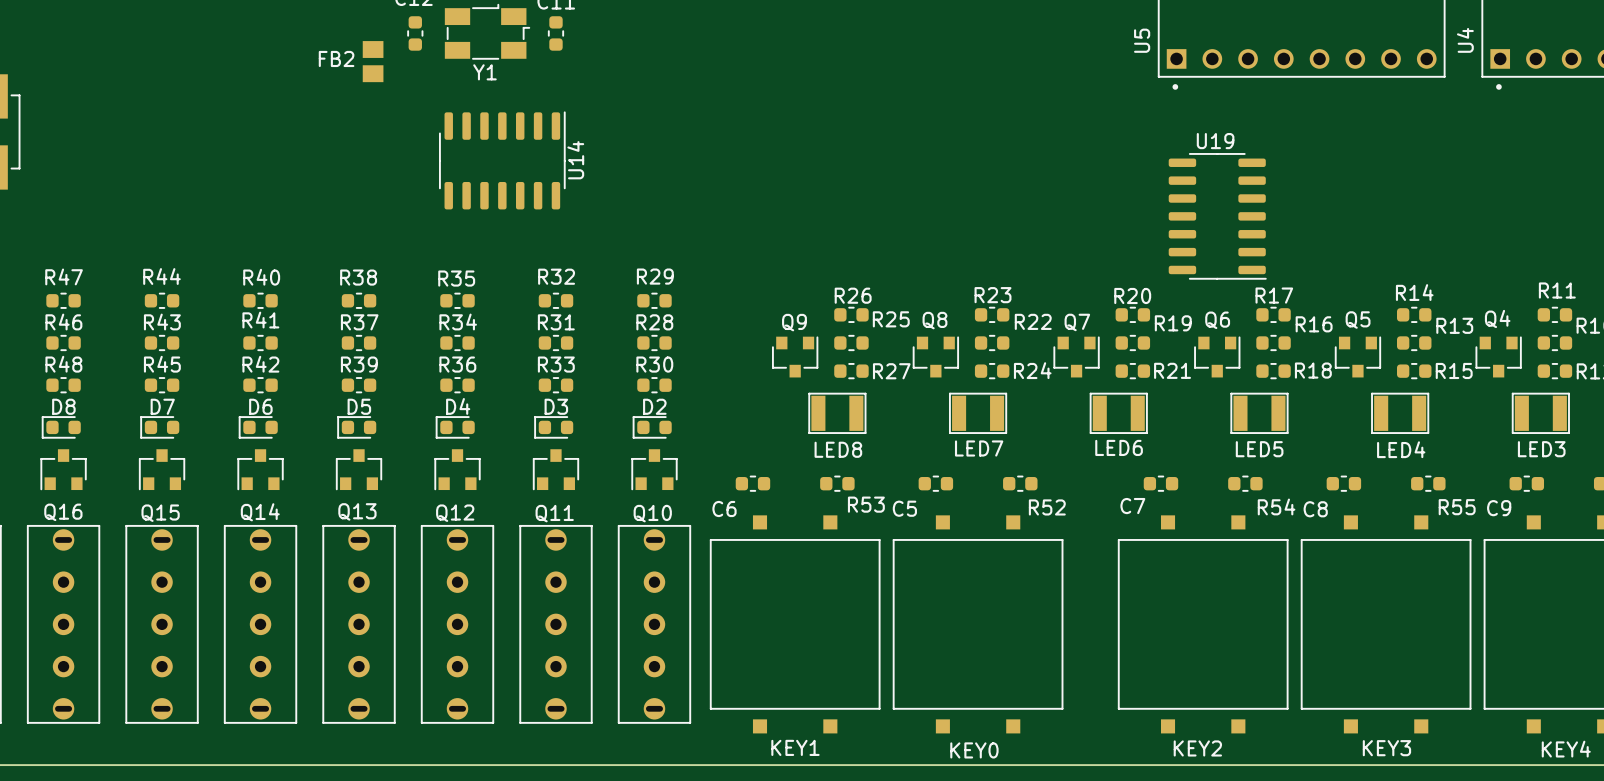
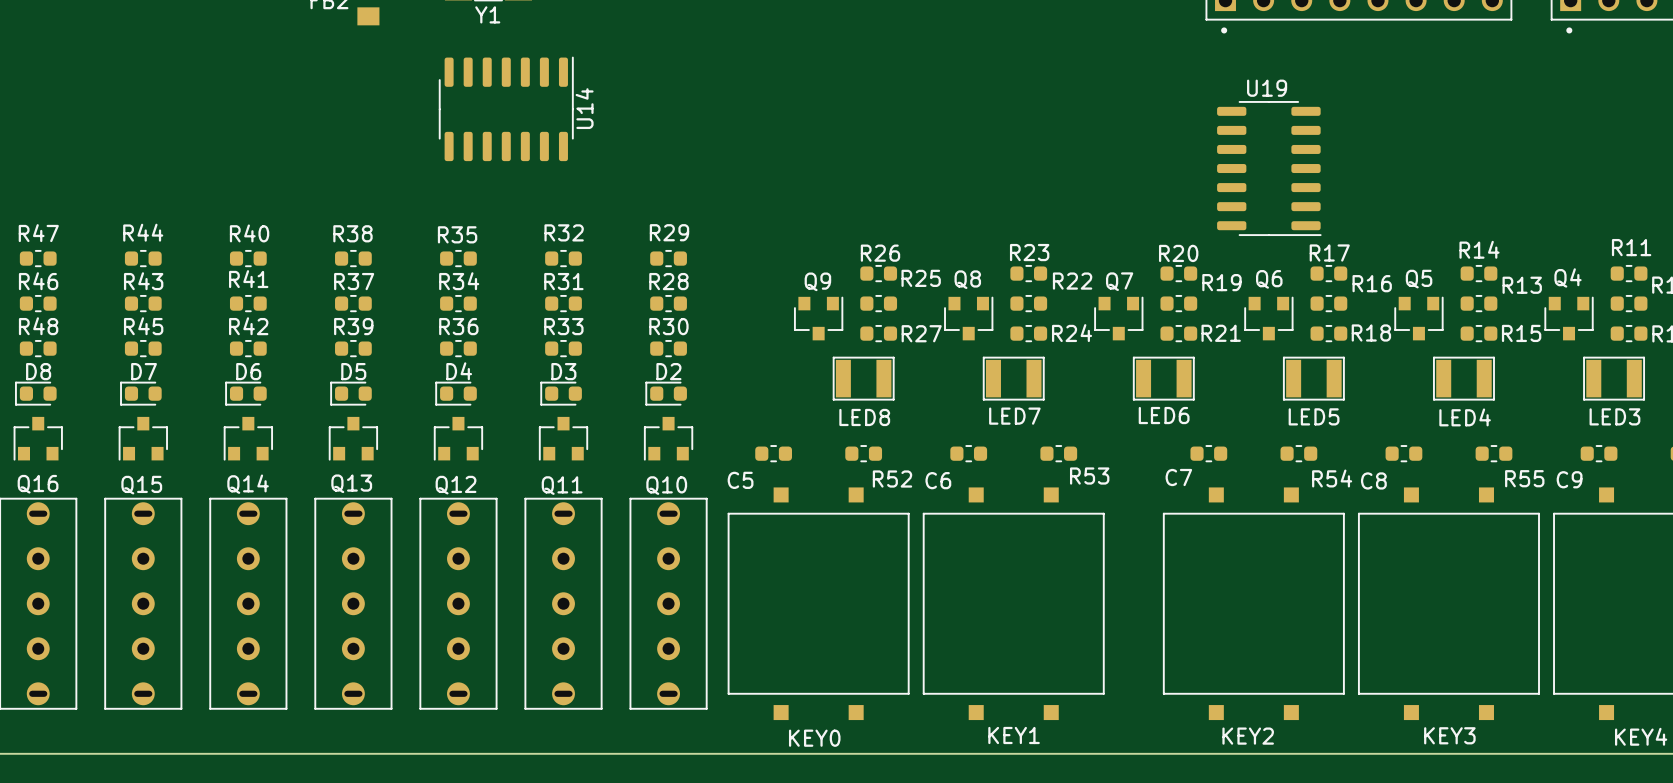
R53 name: R53 (866, 504) -> R52 (892, 479)
R52 name: R52 (1047, 507) -> R53 (1089, 476)
C5 name: C5 (904, 508) -> C6 (938, 480)
C6 name: C6 (724, 509) -> C5 (740, 480)
KEY1 name: KEY1 (795, 747) -> KEY0 (814, 738)
KEY0 name: KEY0 (974, 750) -> KEY1 (1014, 735)

